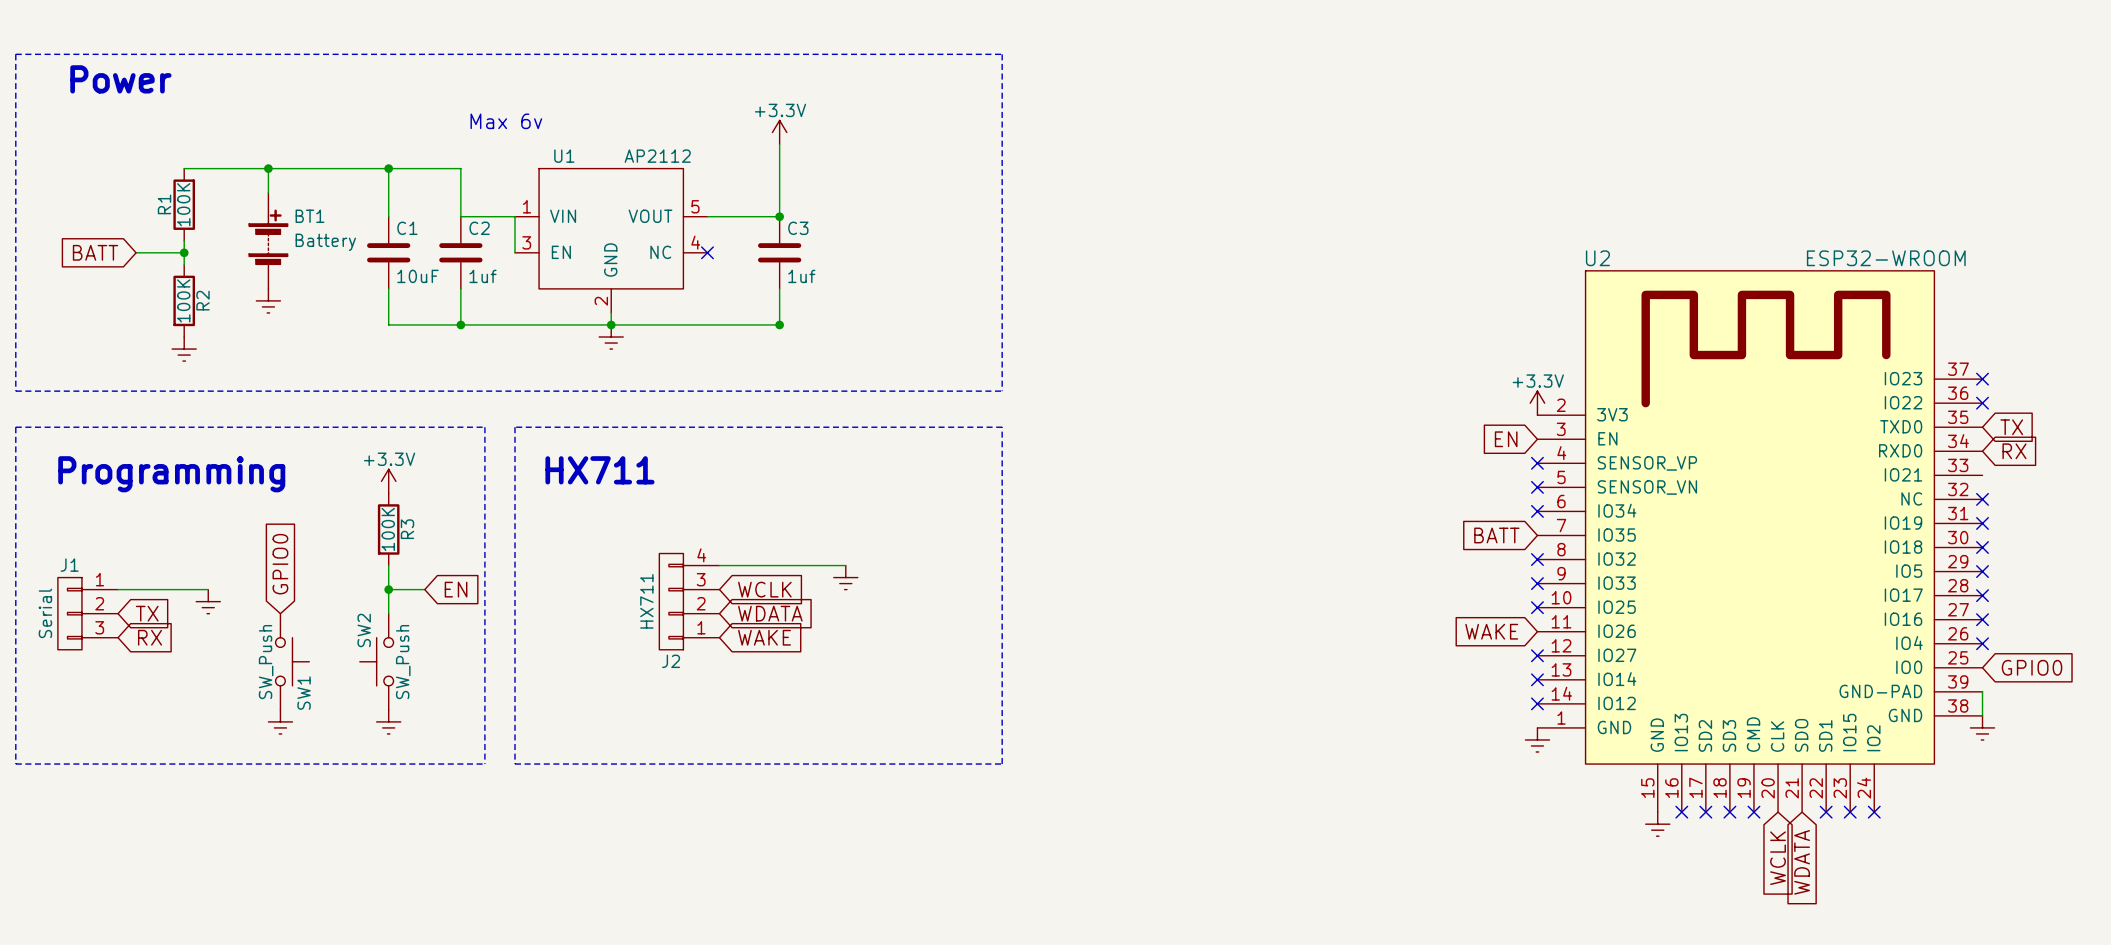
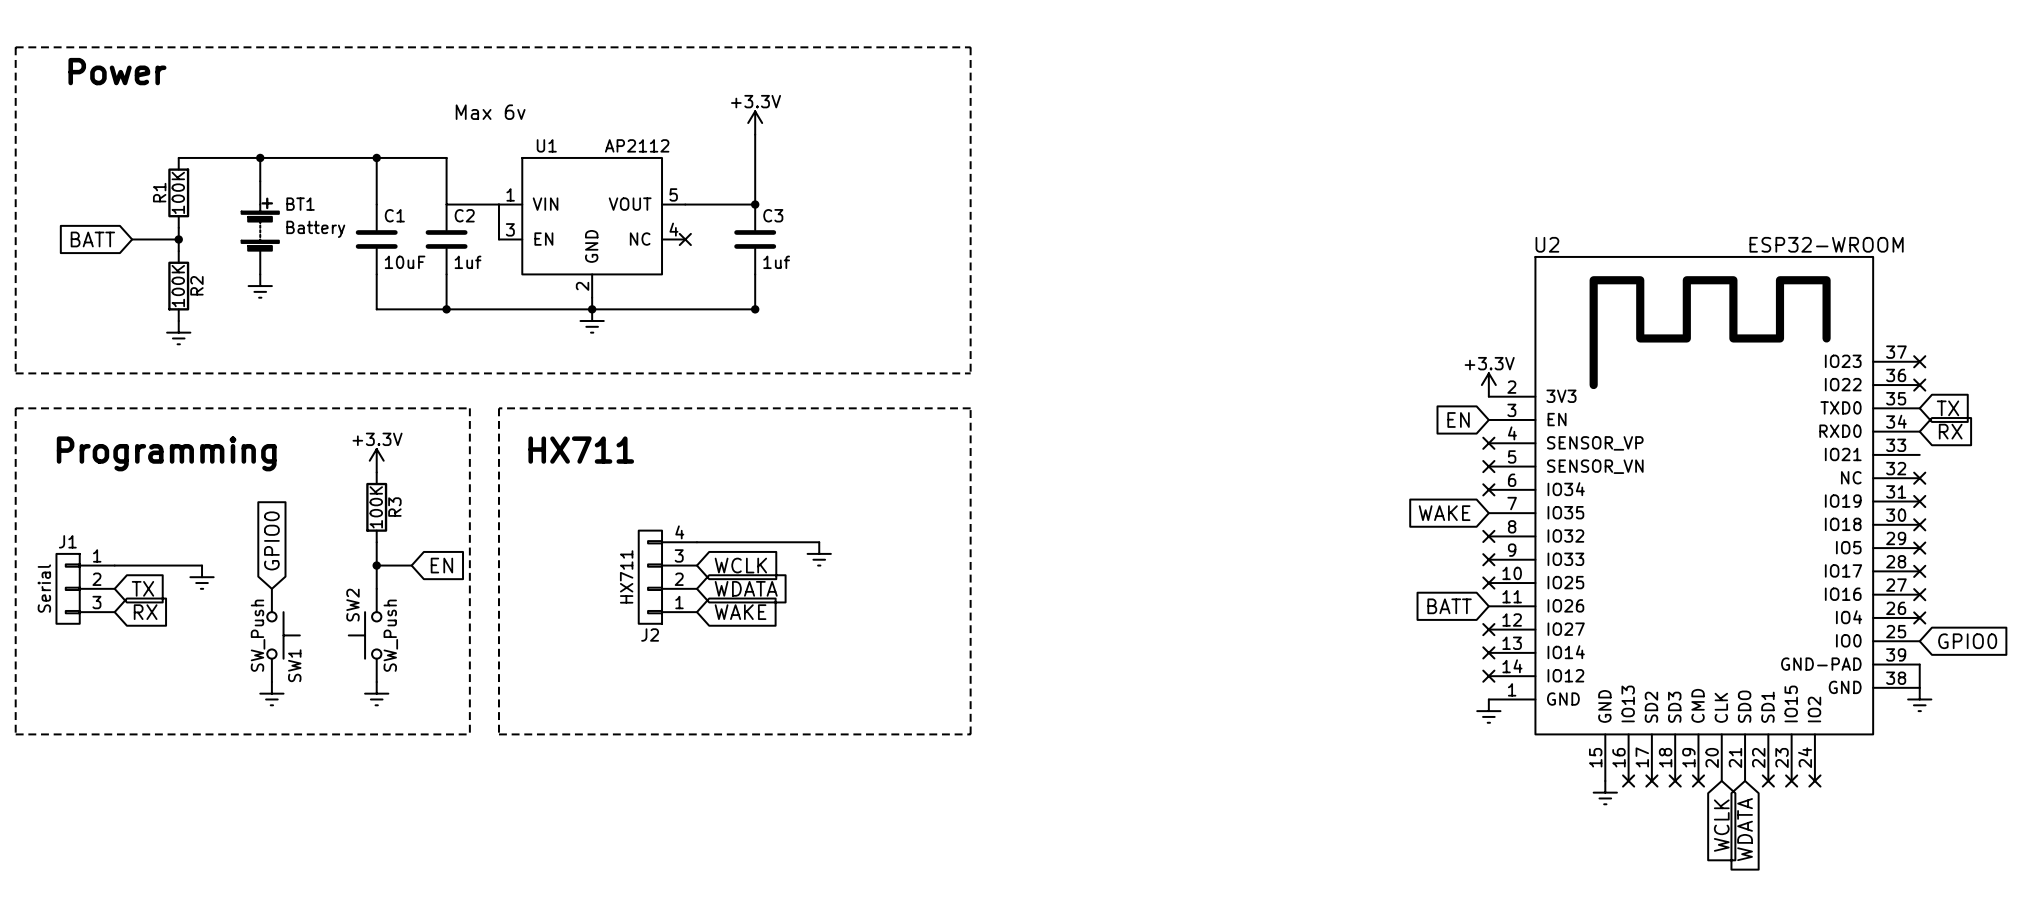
global label: BATT (1496, 535) -> WAKE (1444, 513)
global label: WAKE (1491, 631) -> BATT (1449, 606)

